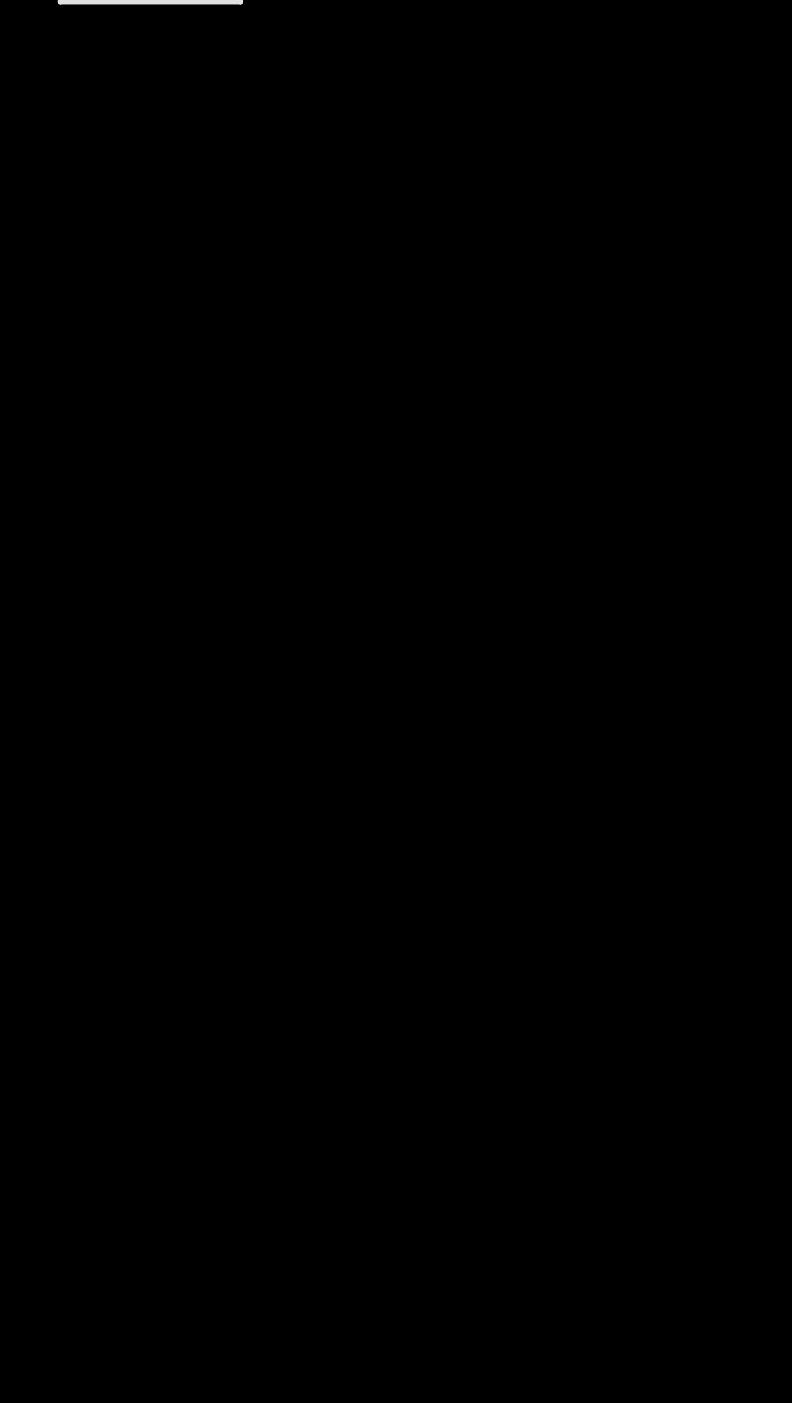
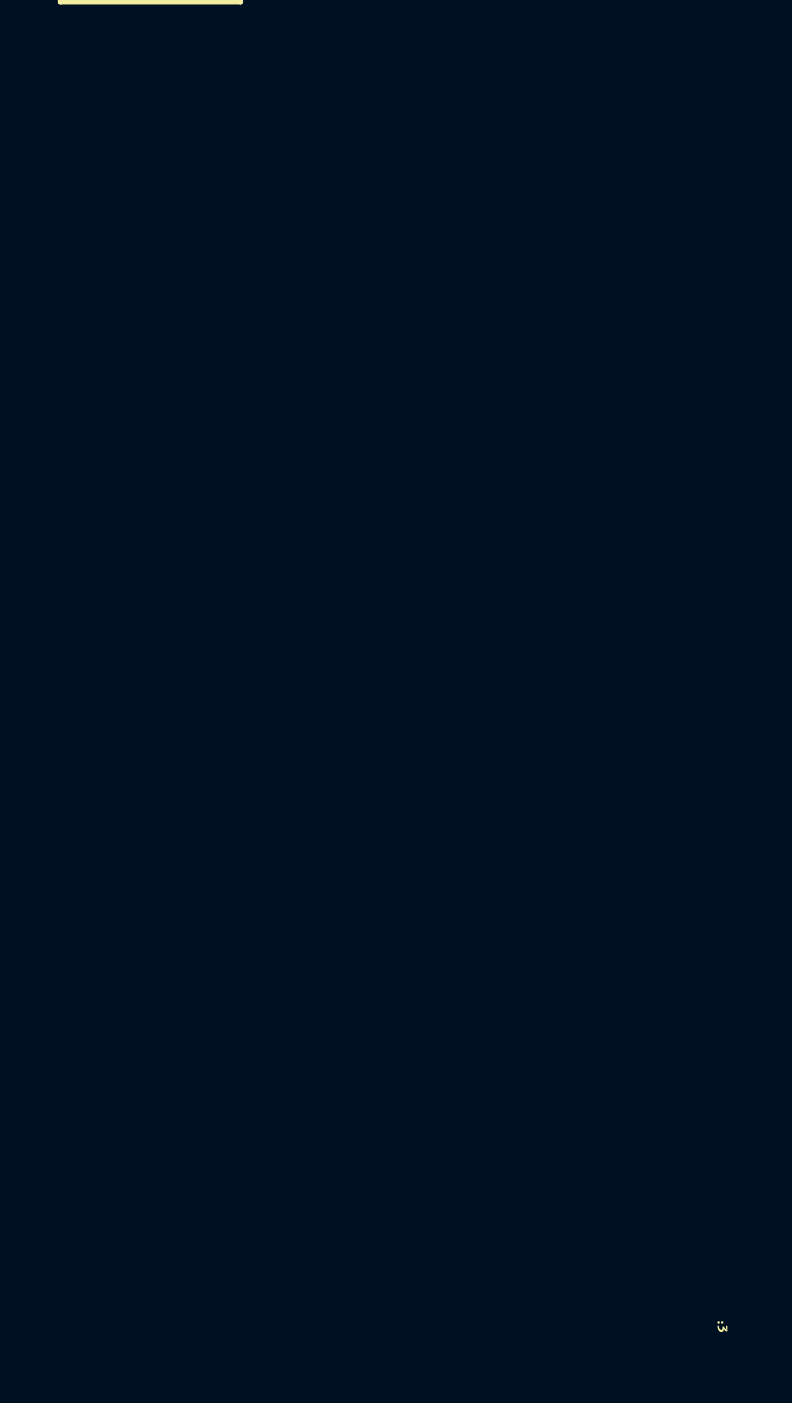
text: none -> :3 (722, 1326)

